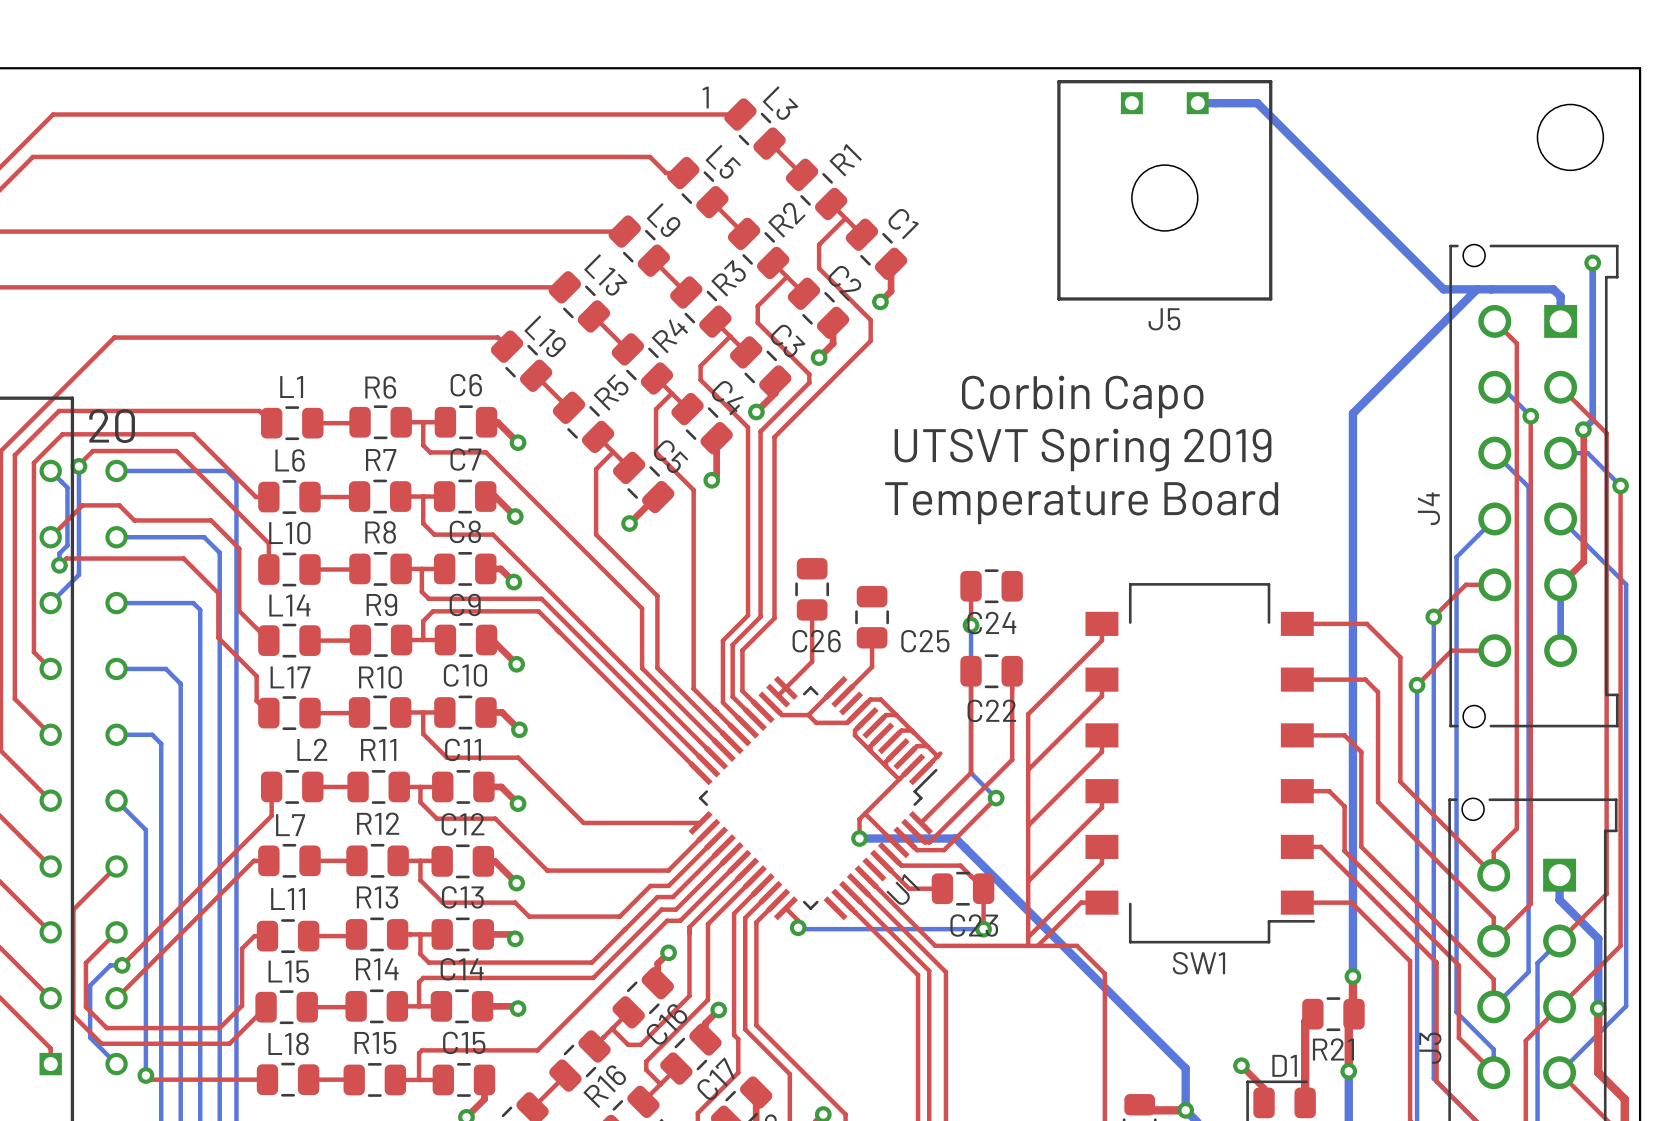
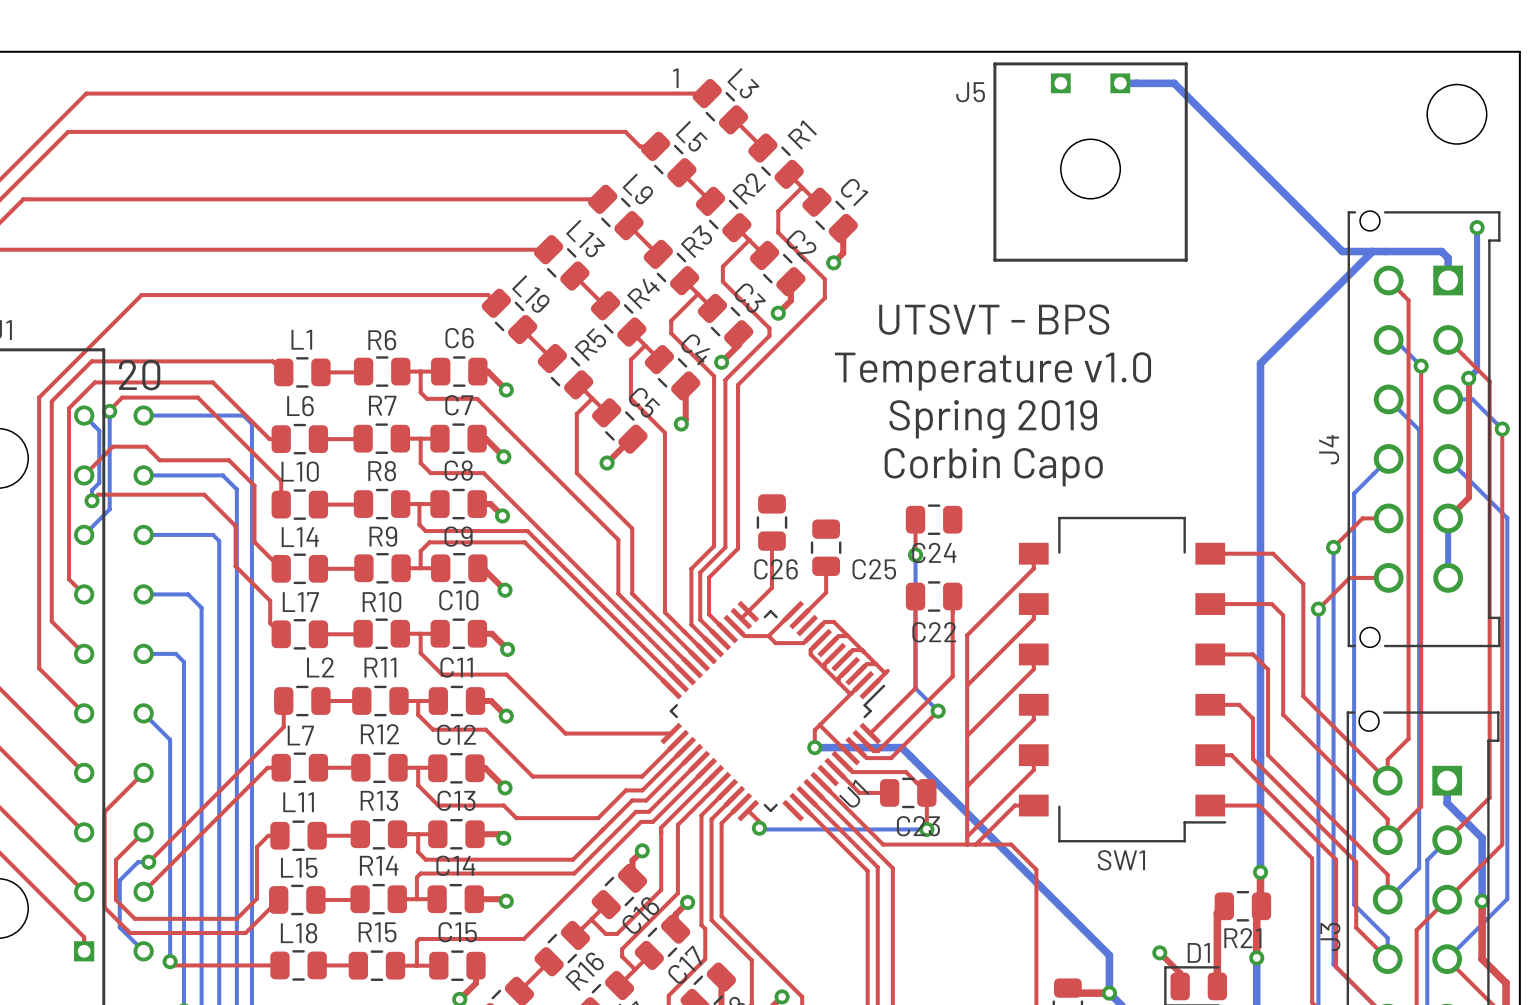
J5 name position: J5 (1164, 319) -> J5 (970, 92)
text: none -> UTSVT - BPS (994, 319)
text position: Corbin Capo (1082, 396) -> Corbin Capo (993, 467)
text: none -> Temperature v1.0 (992, 371)
text: UTSVT Spring 2019 (1083, 450) -> Spring 2019 (993, 419)
text: Temperature Board (1081, 503) -> none

